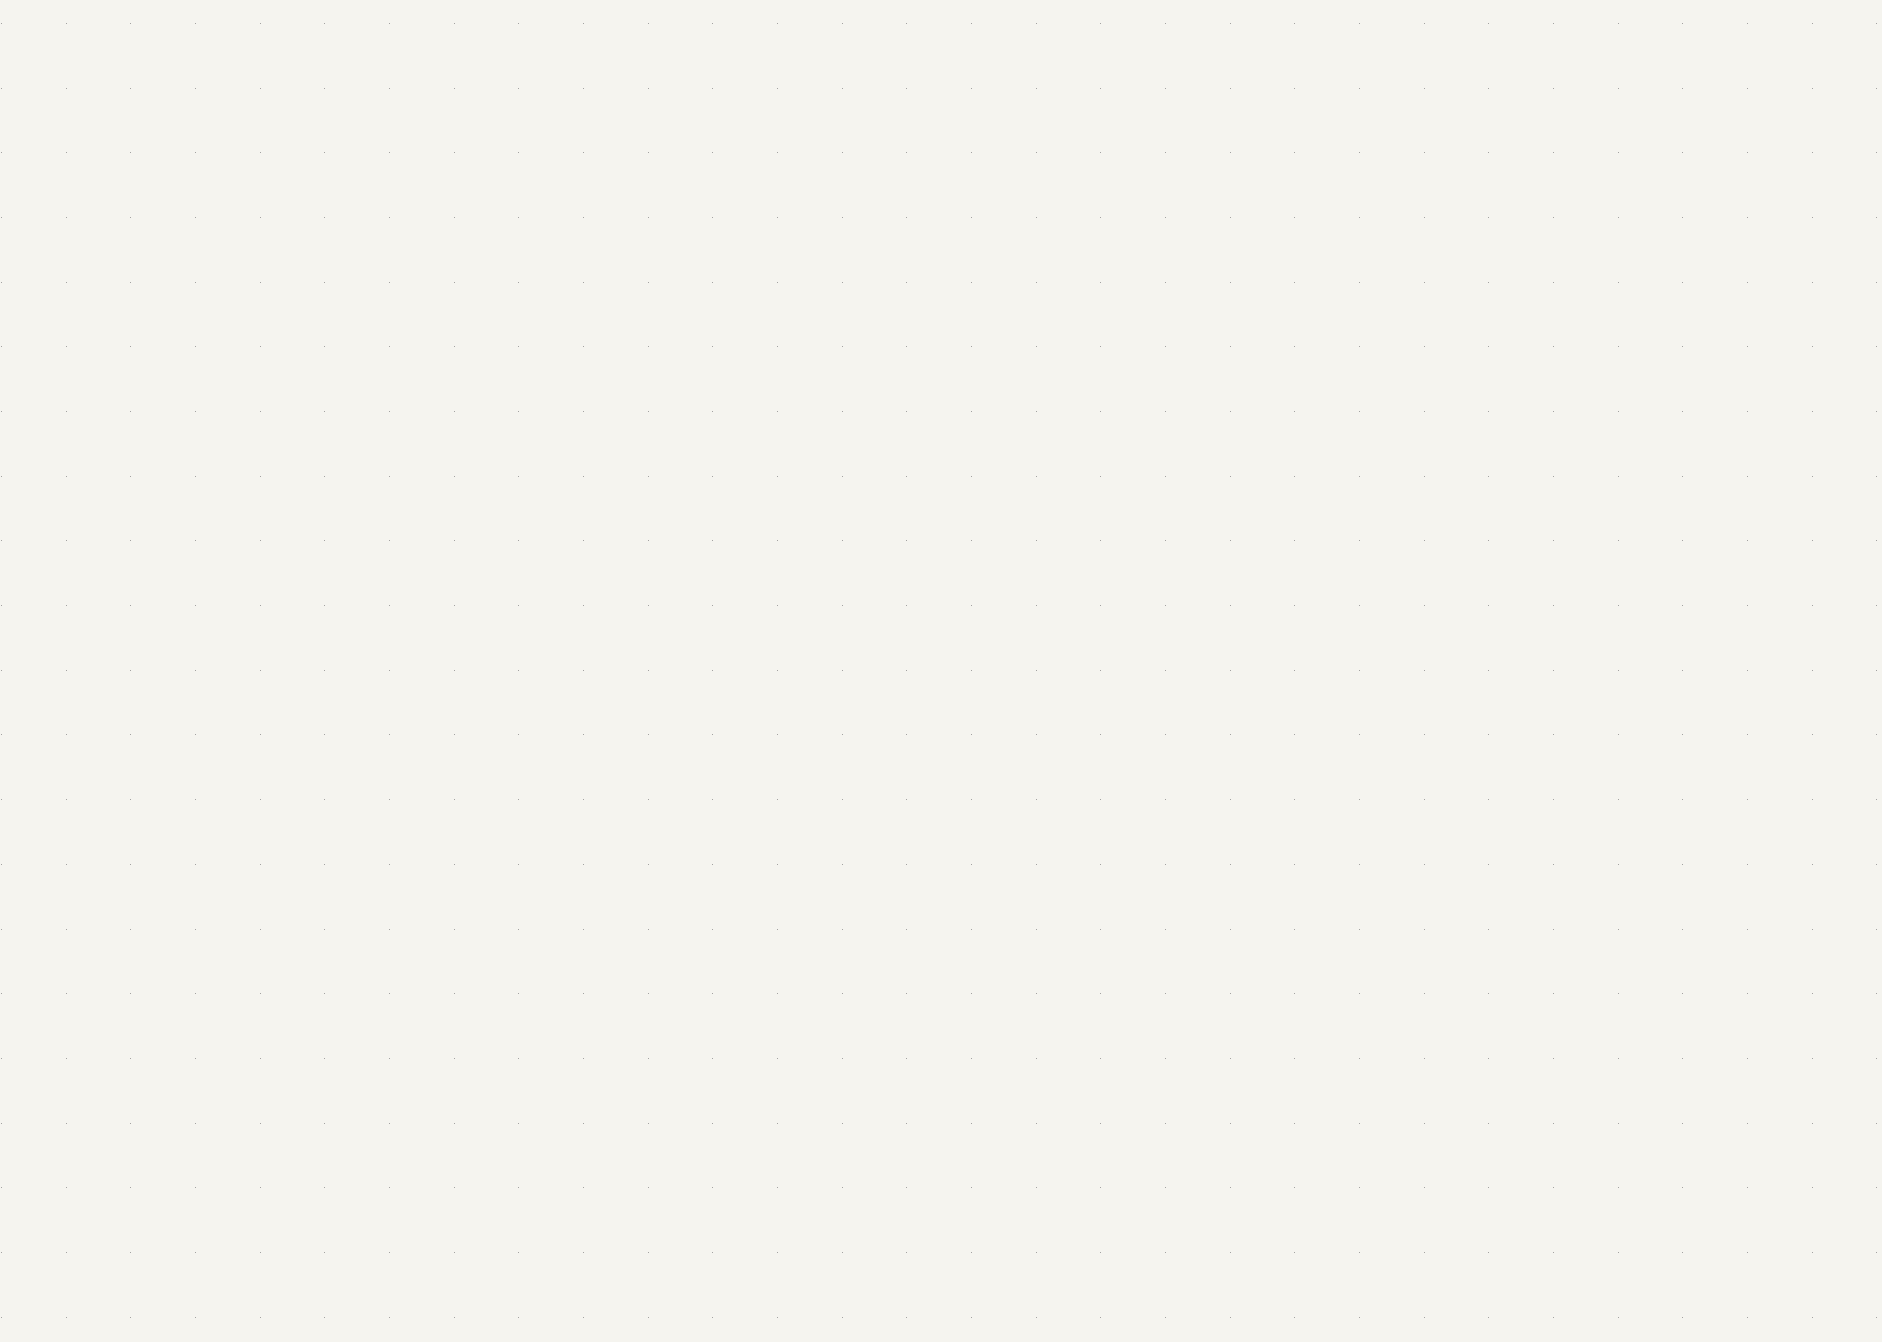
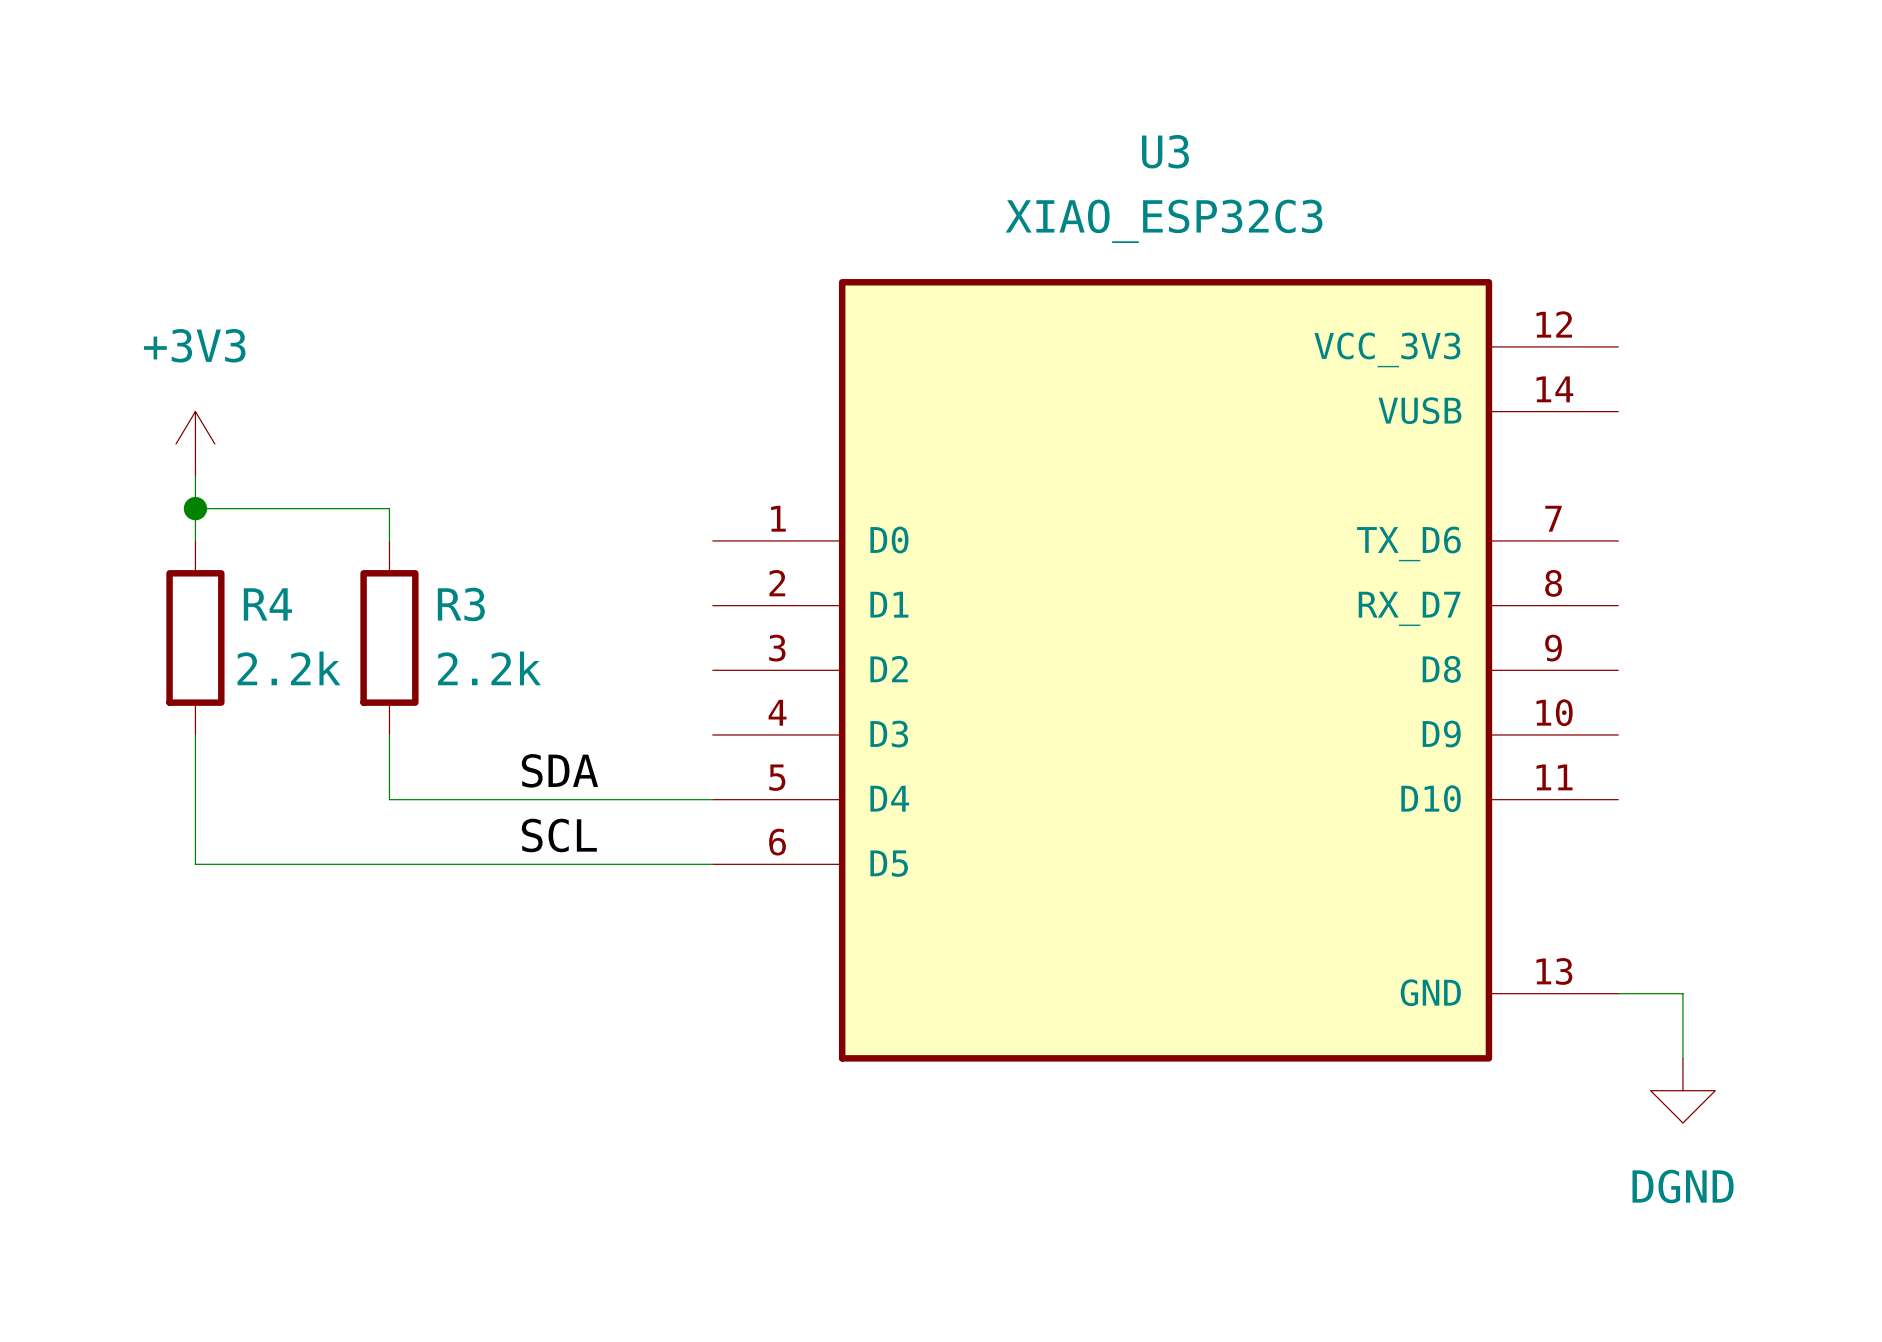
power symbol: none -> +3V3 (195, 443)
wire: none -> (195, 476) (195, 540)
wire: none -> (195, 508) (389, 508) (389, 540)
junction: none -> (195, 508)
R4: none -> 2.2k (195, 637)
R3: none -> 2.2k (389, 637)
U3: none -> XIAO_ESP32C3 (1165, 670)
wire: none -> (195, 734) (195, 864) (712, 864)
wire: none -> (389, 734) (389, 799) (712, 799)
label: none -> SDA (559, 770)
label: none -> SCL (559, 835)
wire: none -> (1618, 993) (1682, 993) (1682, 1058)
power symbol: none -> DGND (1682, 1090)

